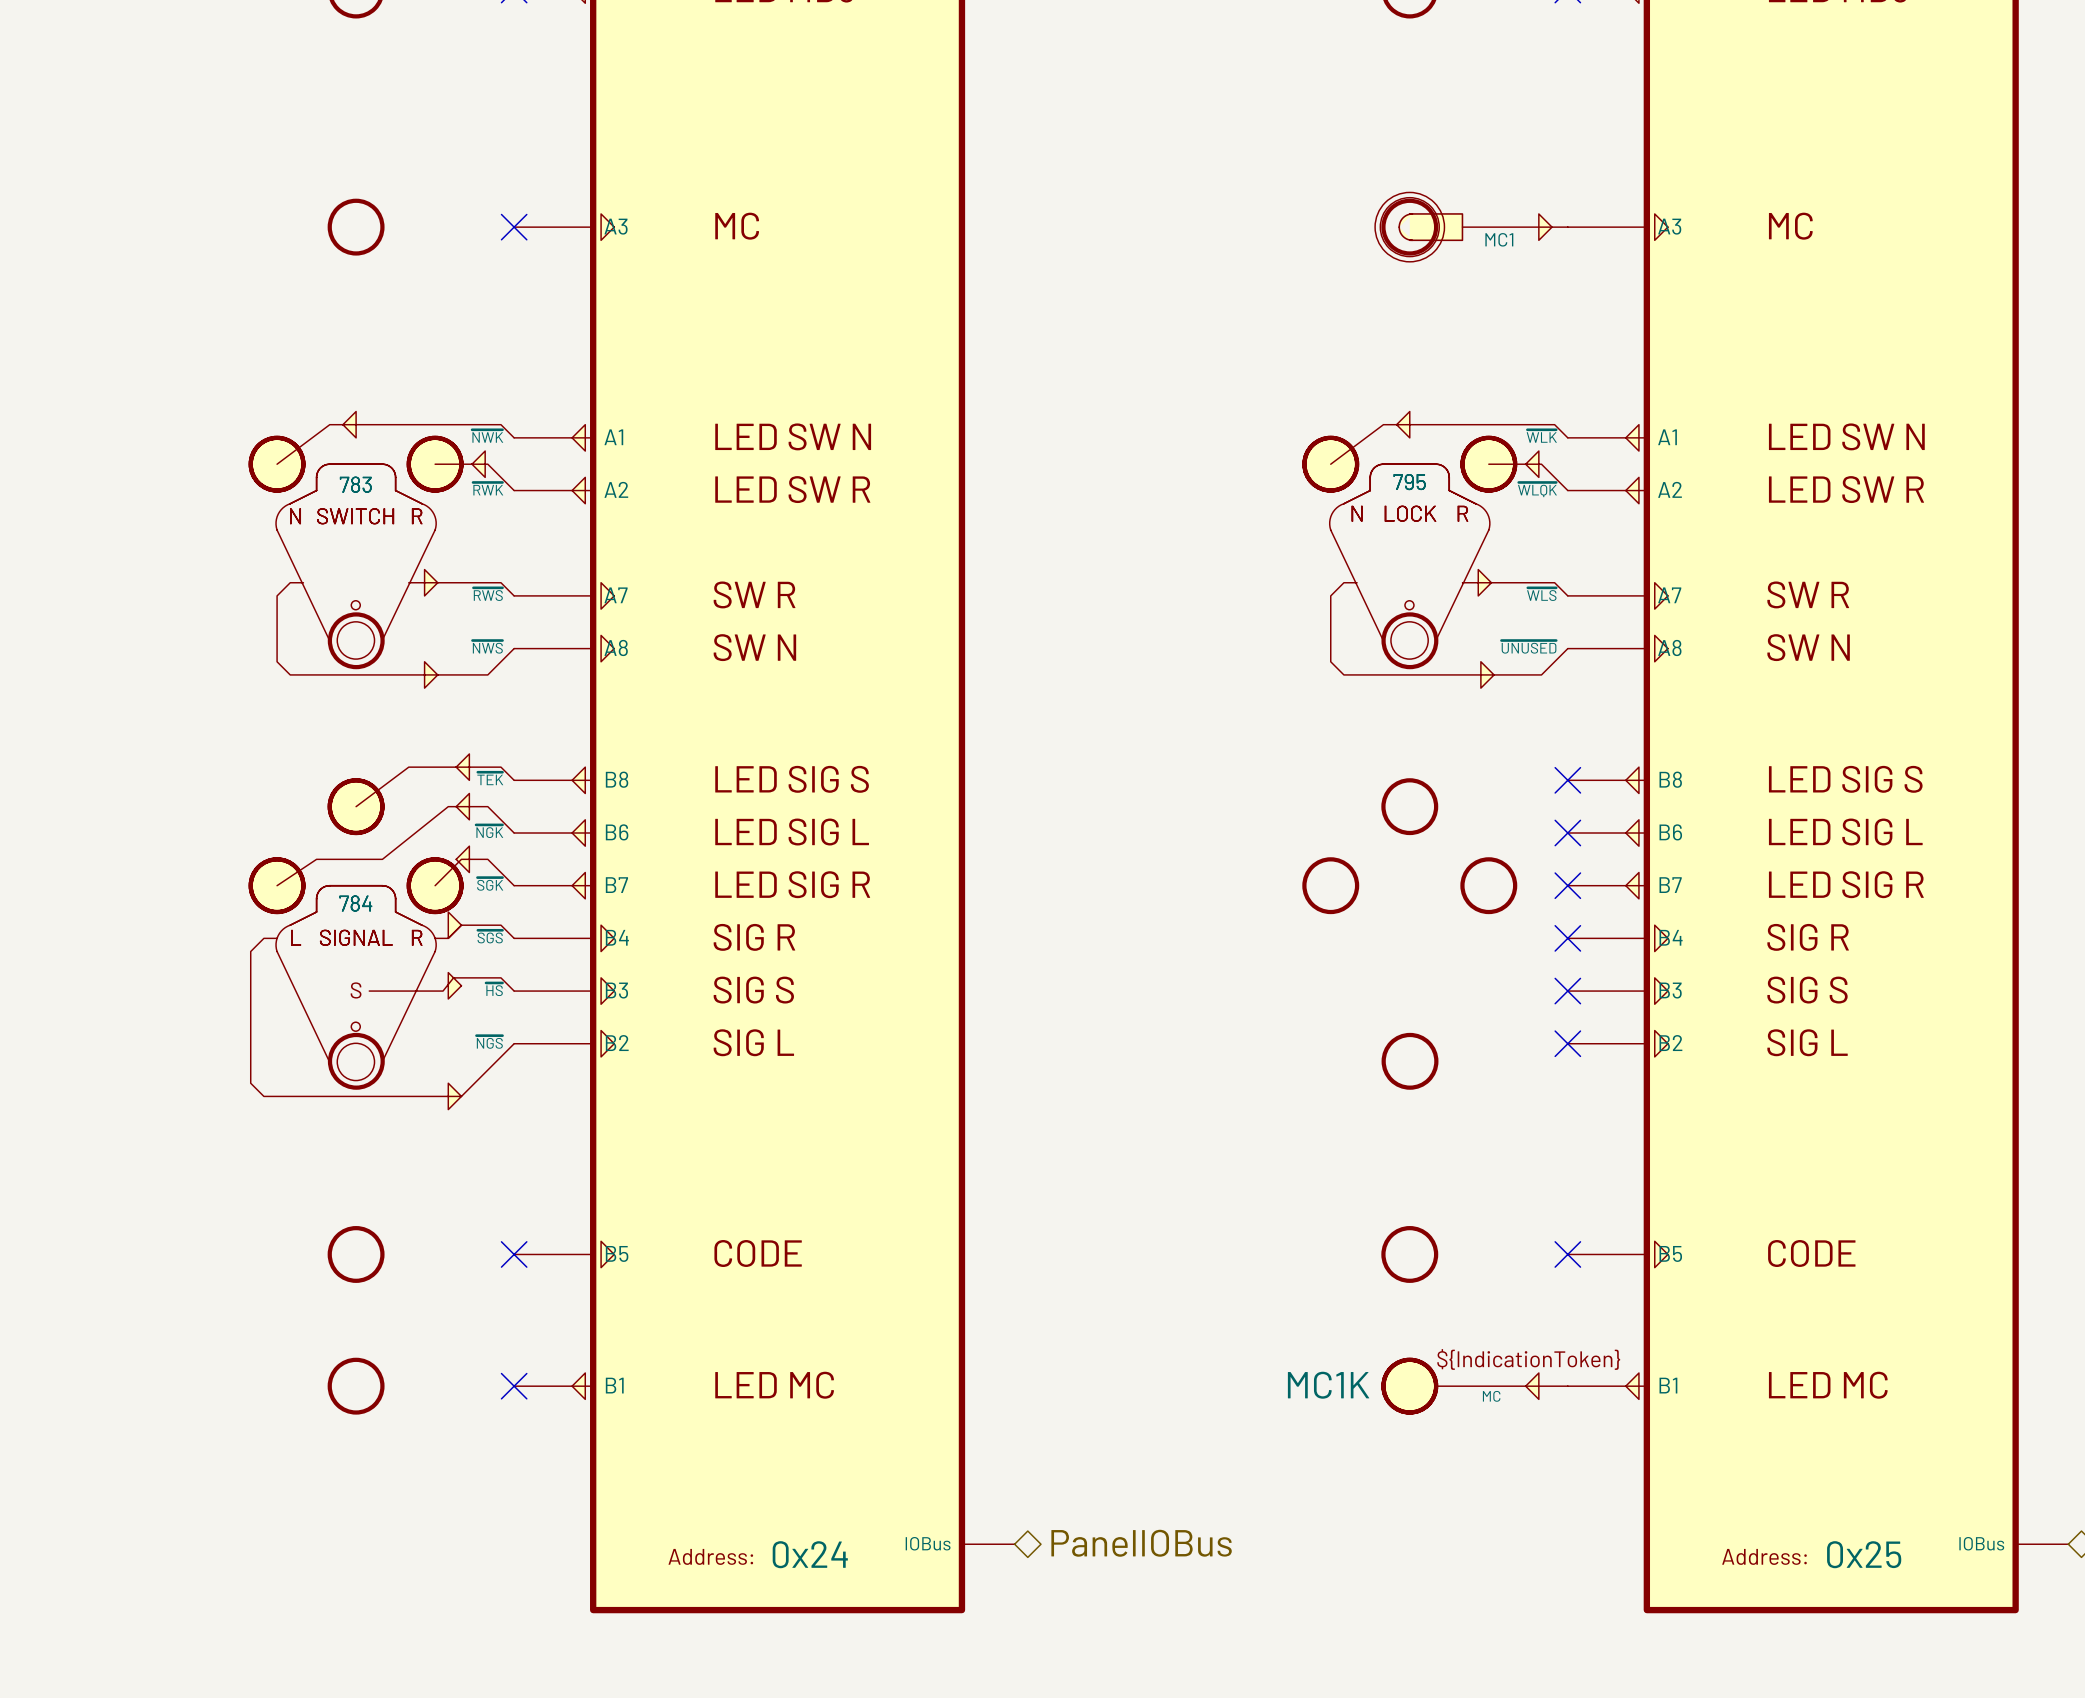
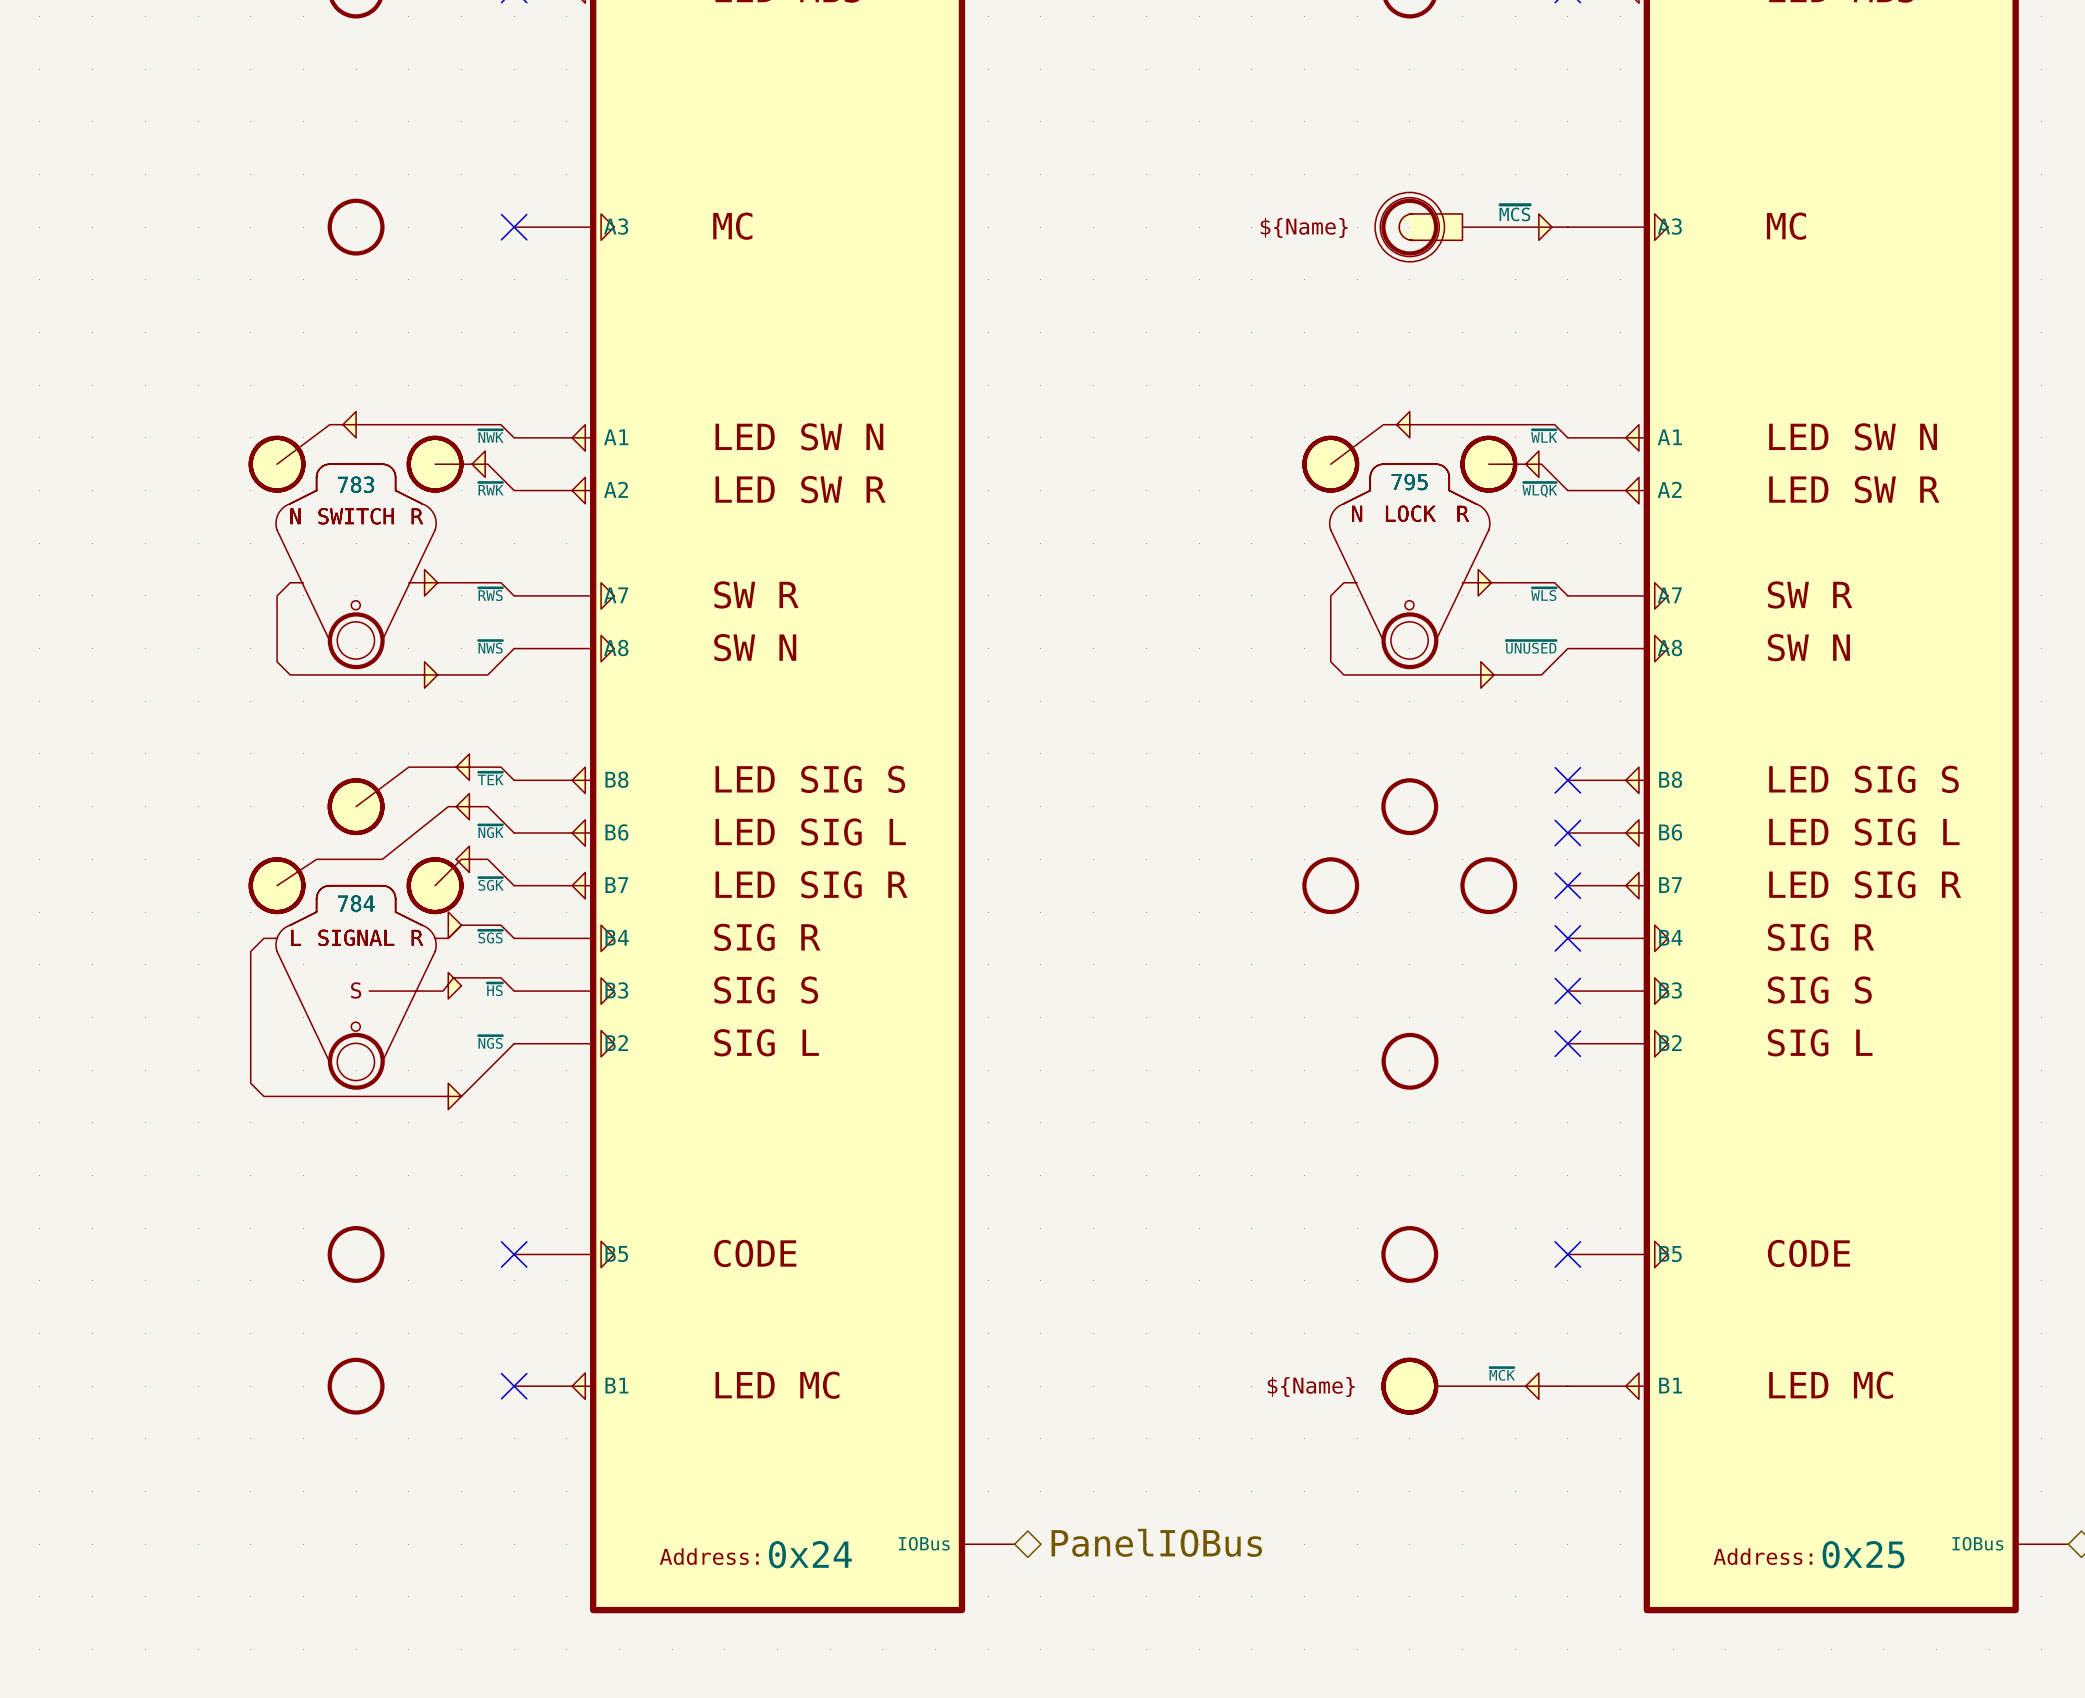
part pin name: none -> ~{MCS} (1514, 213)
part text: none -> ${Name} (1304, 227)
part value: MC1 (1499, 239) -> none
part text: ${IndicationToken} (1528, 1359) -> none
part pin name: none -> ~{MCK} (1502, 1374)
part text: none -> ${Name} (1311, 1387)
part text: MC1K (1328, 1385) -> none
part value: MC (1491, 1396) -> none

